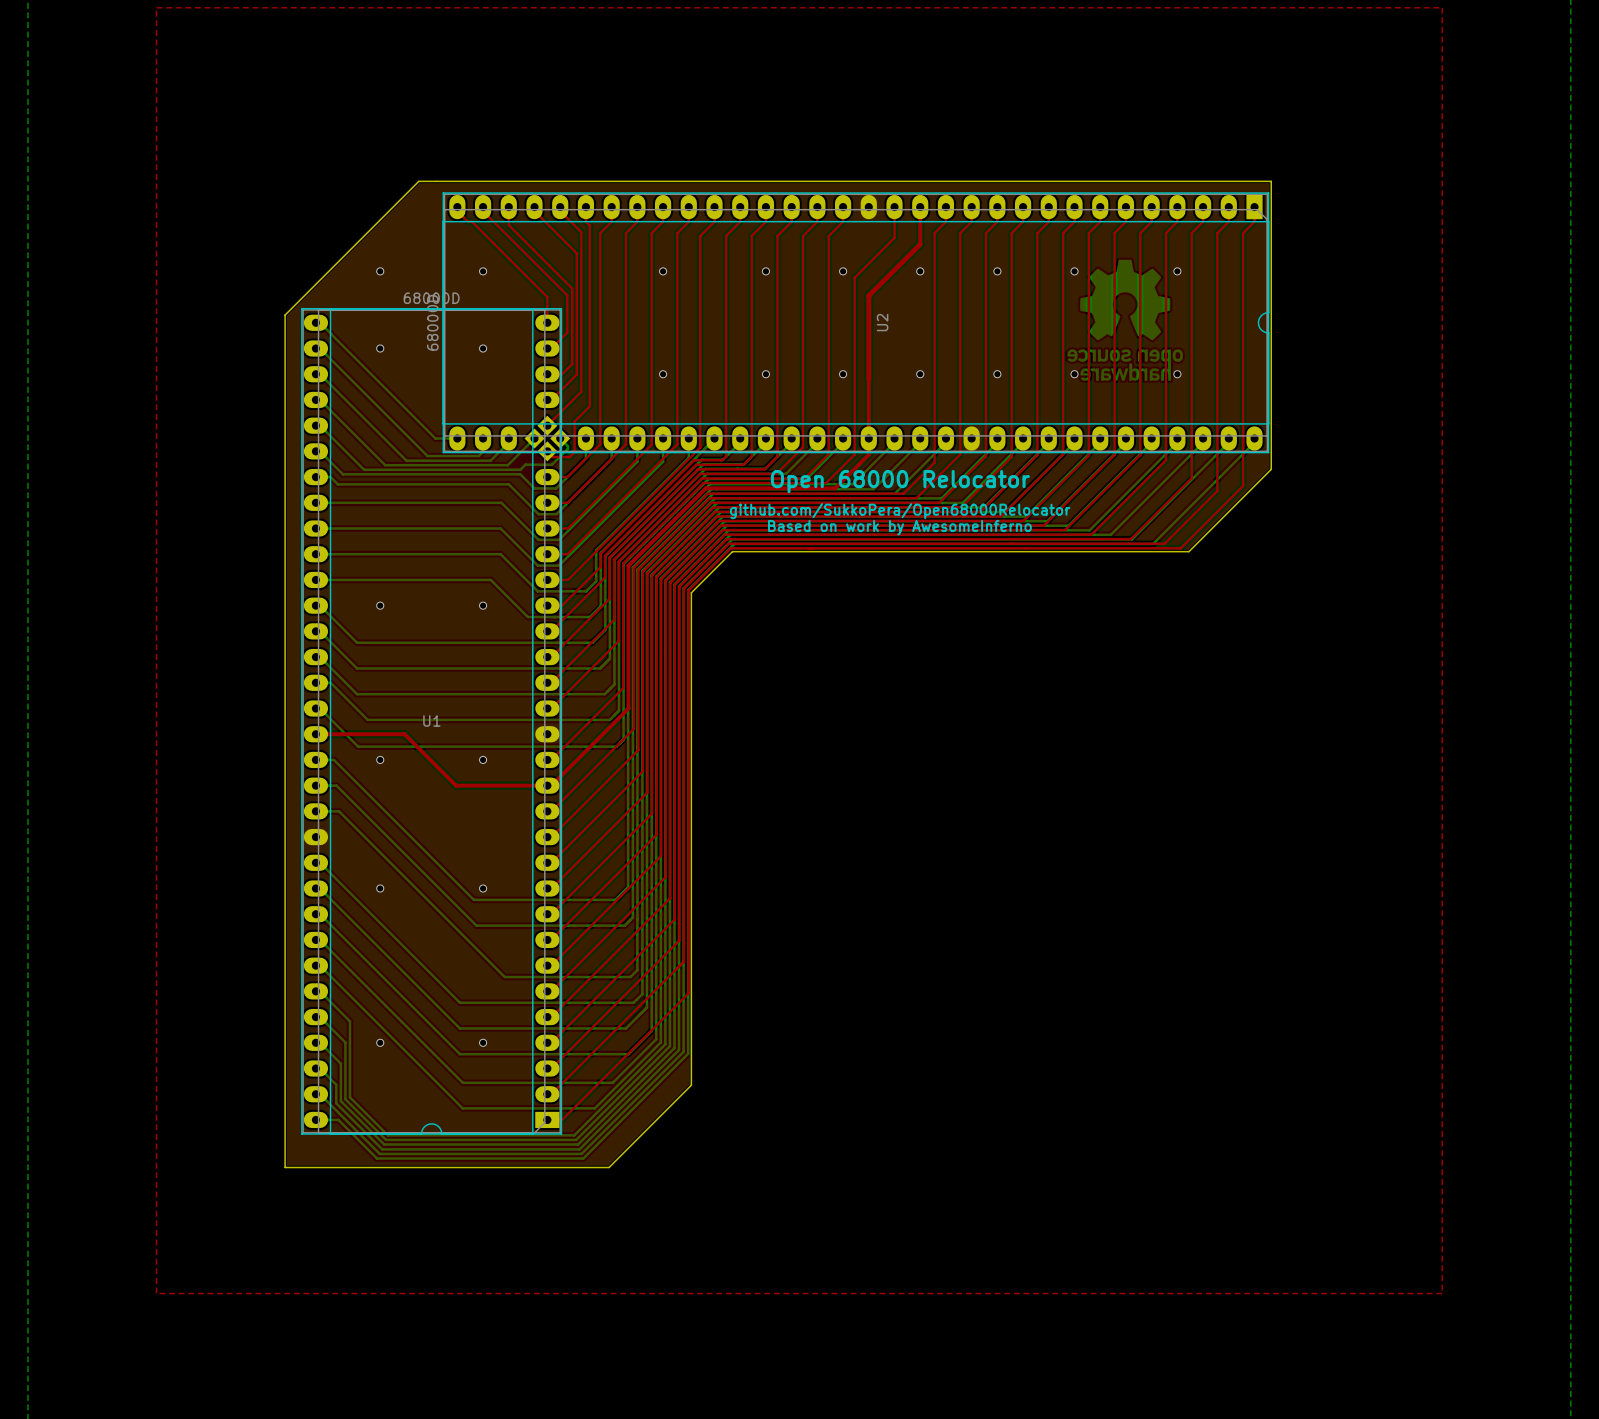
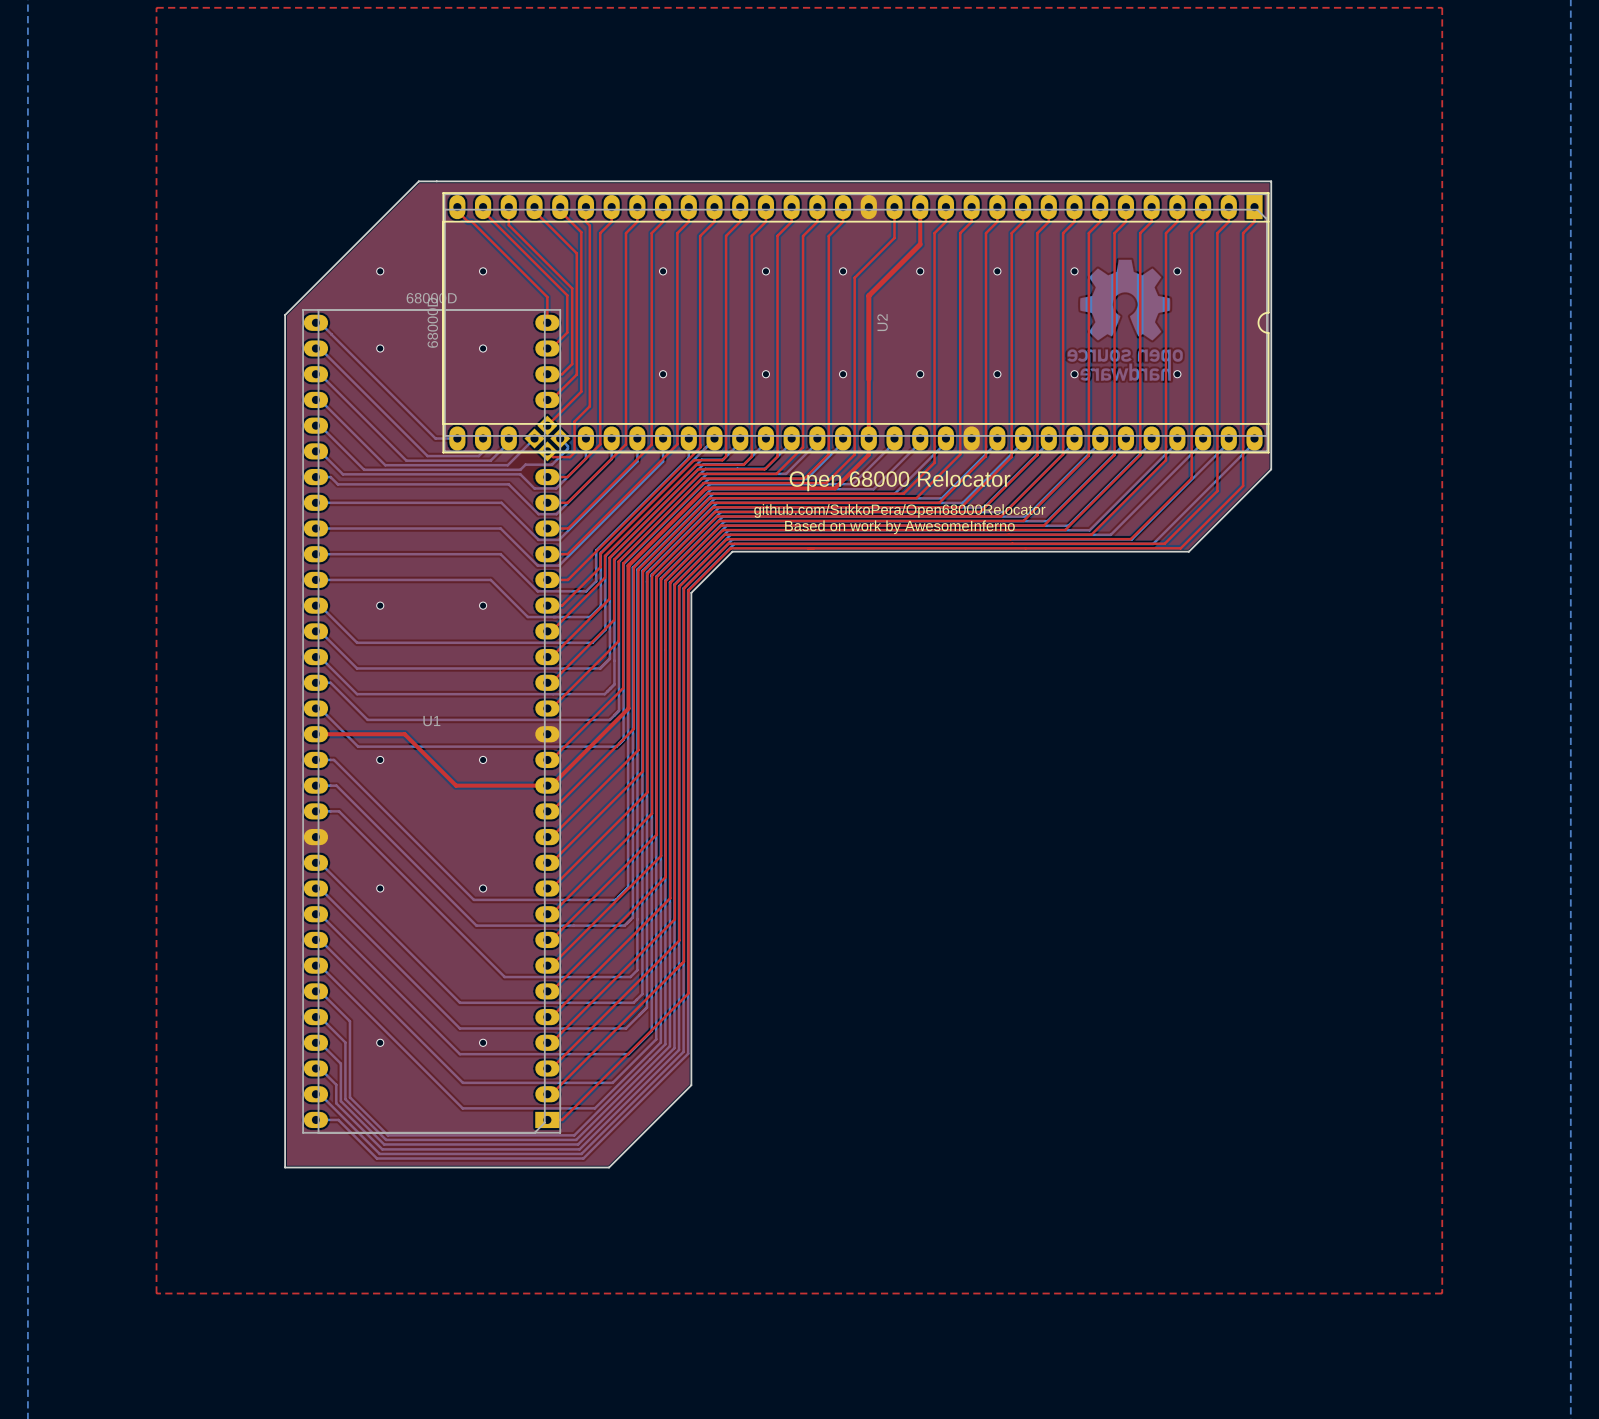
U2 footprint: [442, 192, 1270, 454] -> [442, 192, 1270, 454]
U1 footprint: [301, 308, 563, 1135] -> [302, 309, 561, 1134]

